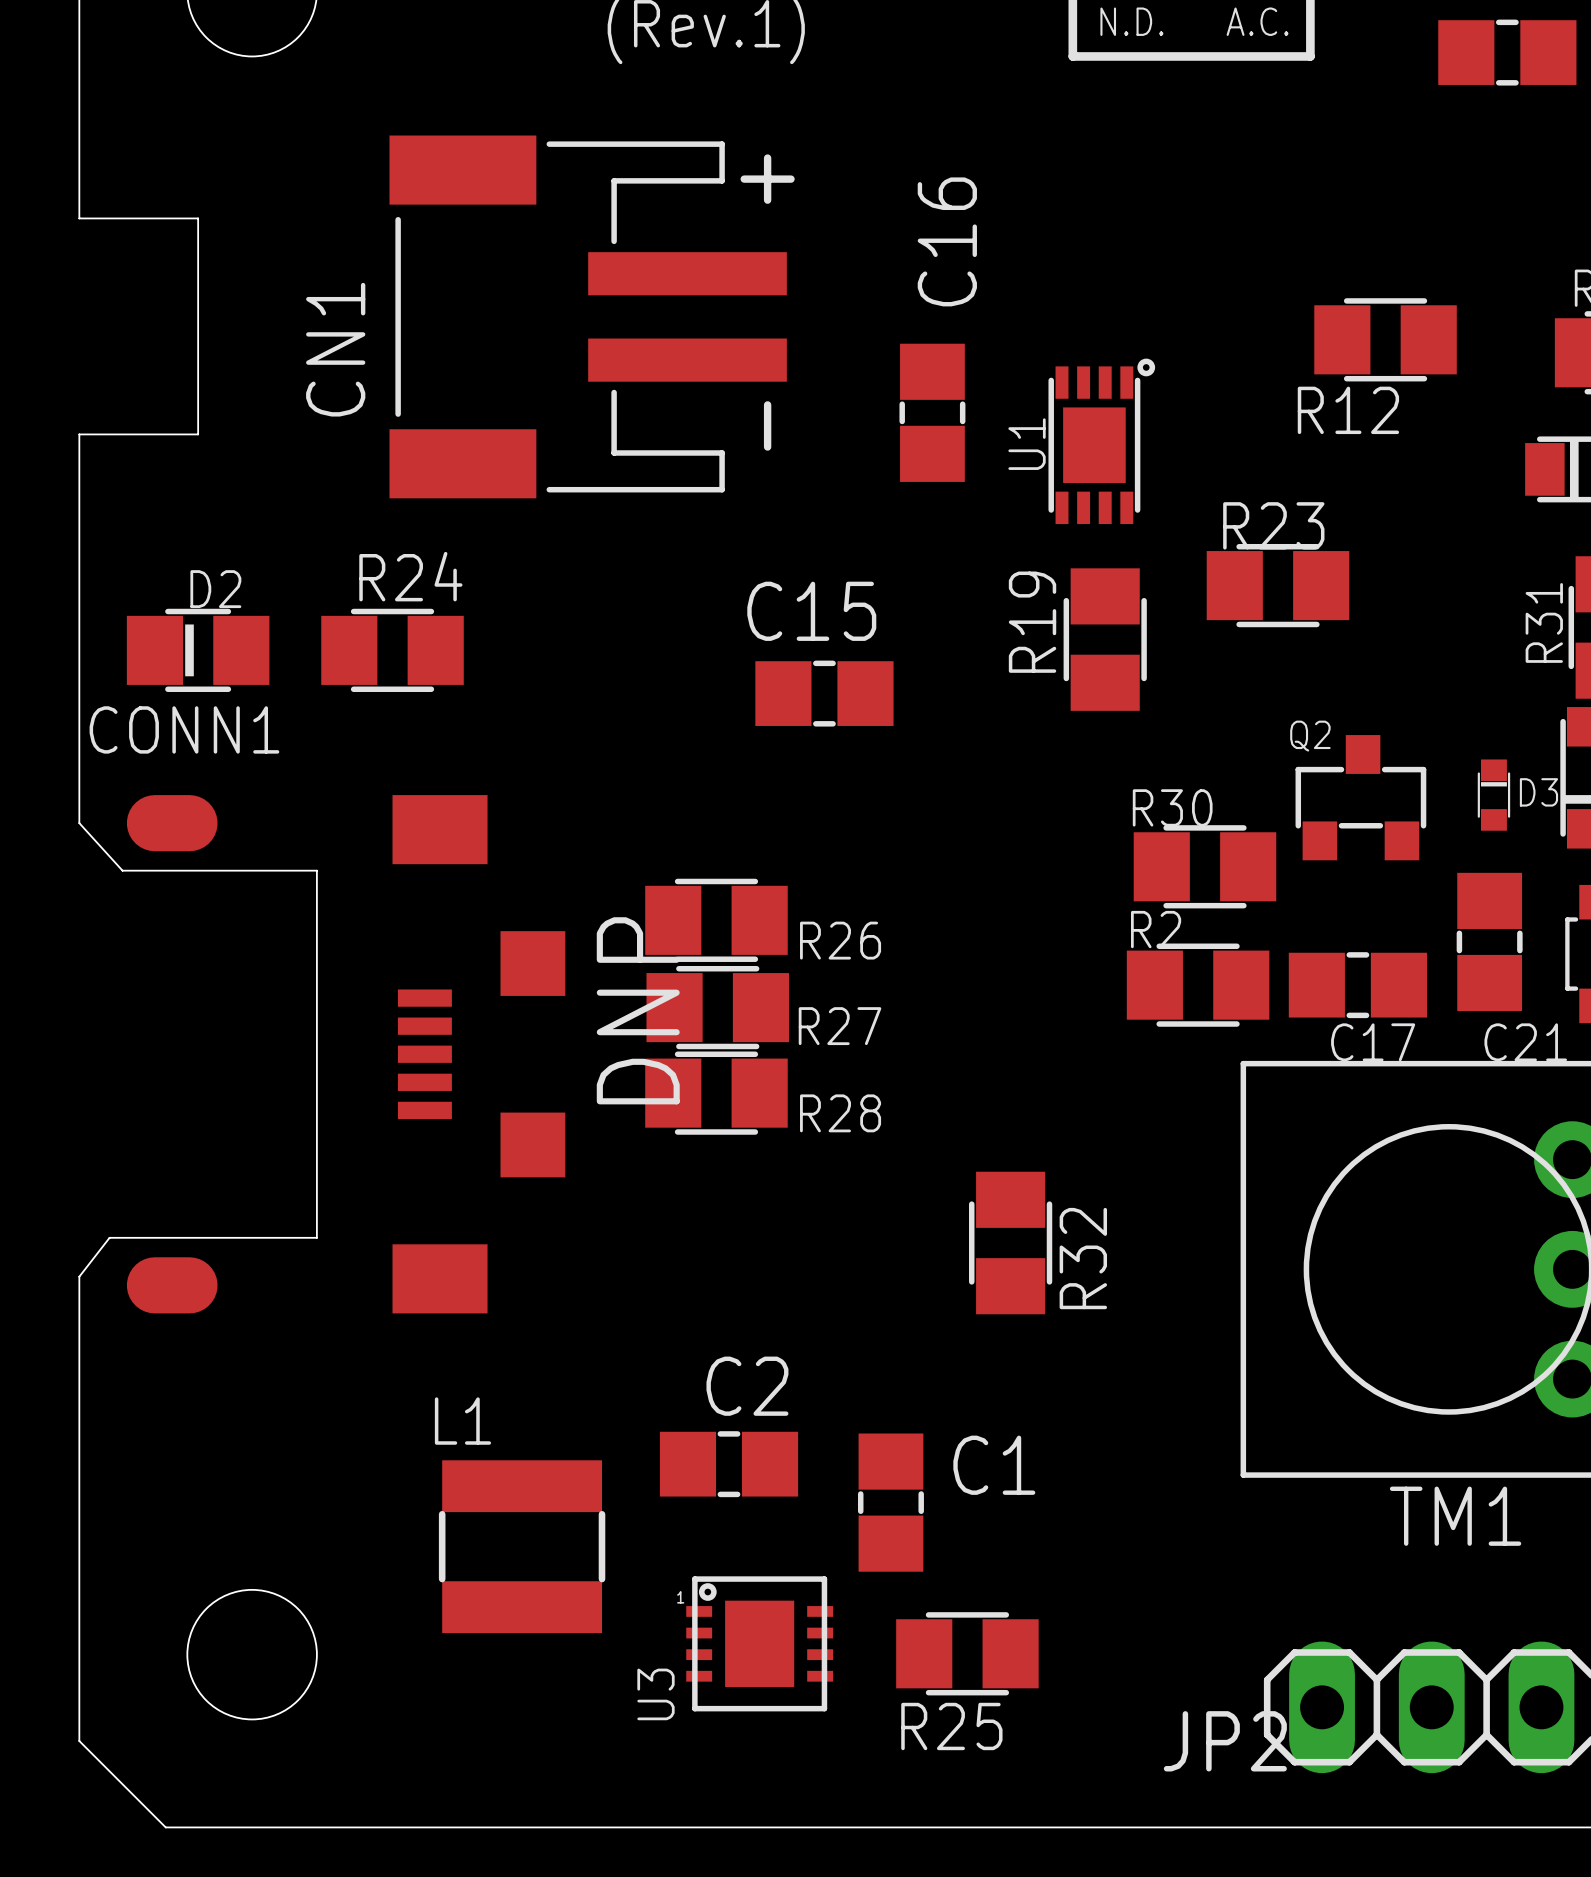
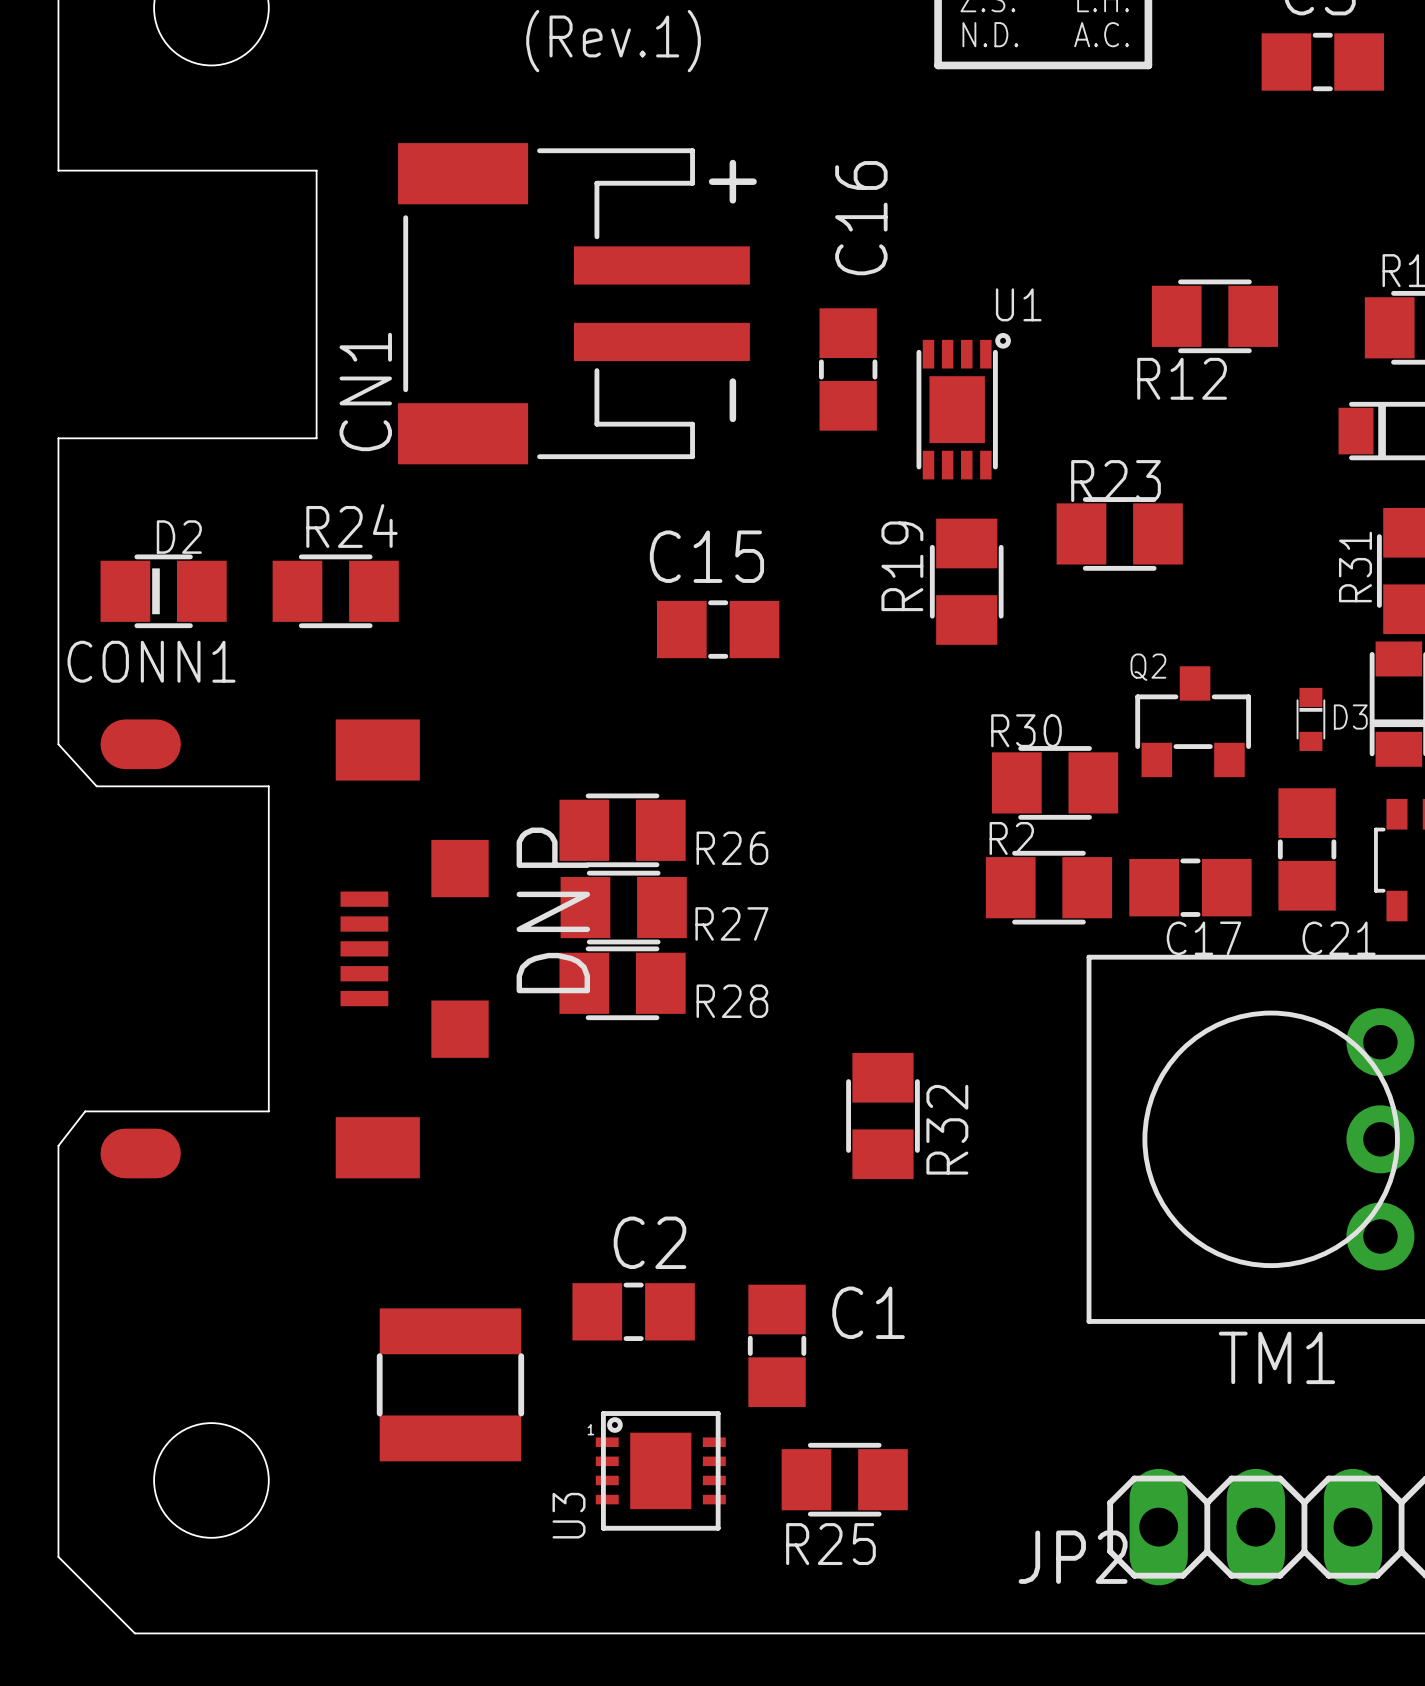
board edge: (79, 175) (79, 218) (198, 218) (198, 434) (79, 434) (79, 477) -> (58, 170) (316, 170) (316, 438) (58, 438)
CN1 position: (588, 316) -> (573, 303)
CN1 name position: CN1 (335, 349) -> CN1 (365, 392)
C16 position: (932, 412) -> (848, 369)
U1 name rotation: 0° (1027, 444) -> 90° clockwise (1018, 304)
U1 name position: U1 (1027, 444) -> U1 (1018, 304)
text: L1 (462, 1421) -> none

